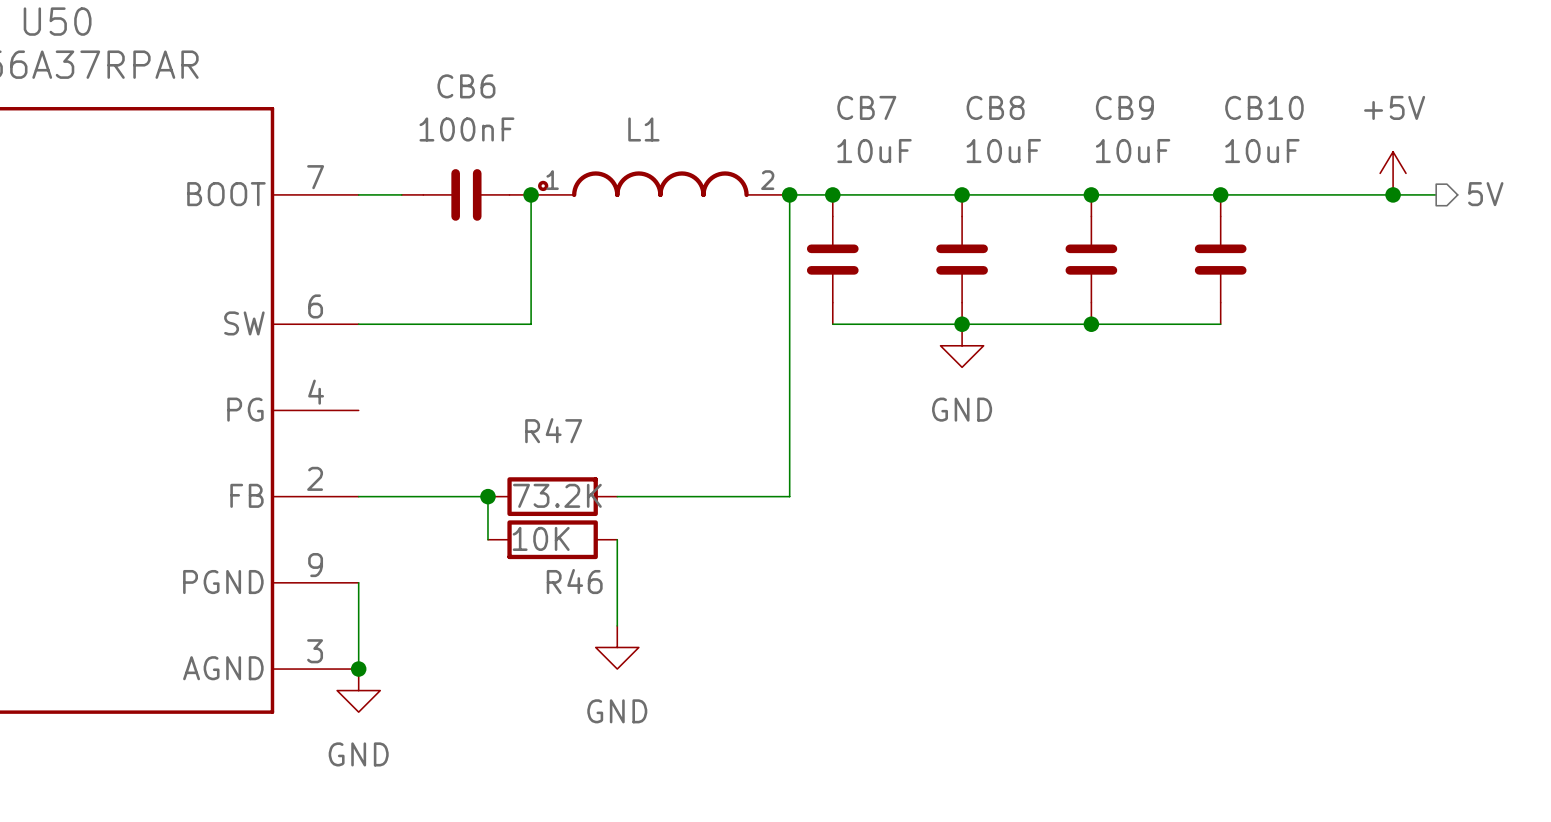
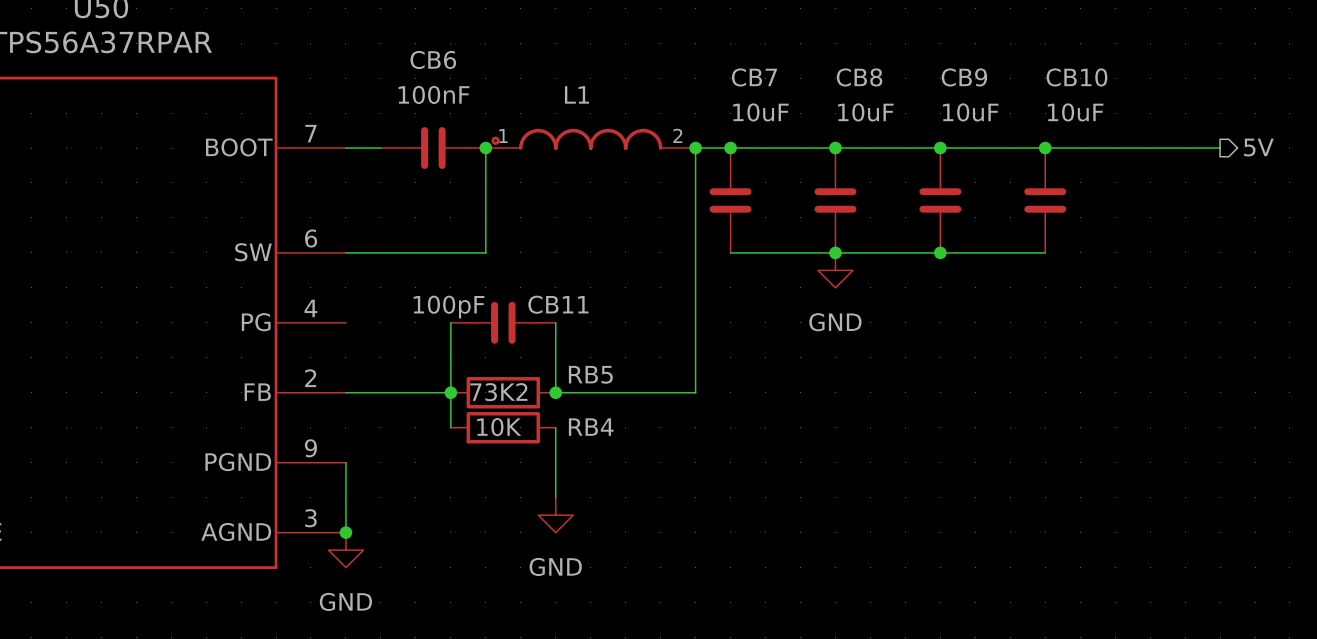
power symbol: +5V (1393, 173) -> none
junction: (1393, 194) -> none
wire: none -> (450, 322) (450, 392)
CB11: none -> 100pF (503, 322)
wire: none -> (555, 322) (555, 392)
R47 name: R47 (553, 430) -> RB5 (590, 374)
R47 value: 73.2K (557, 495) -> 73K2 (498, 392)
junction: none -> (555, 392)
R46 name: R46 (574, 581) -> RB4 (591, 427)

